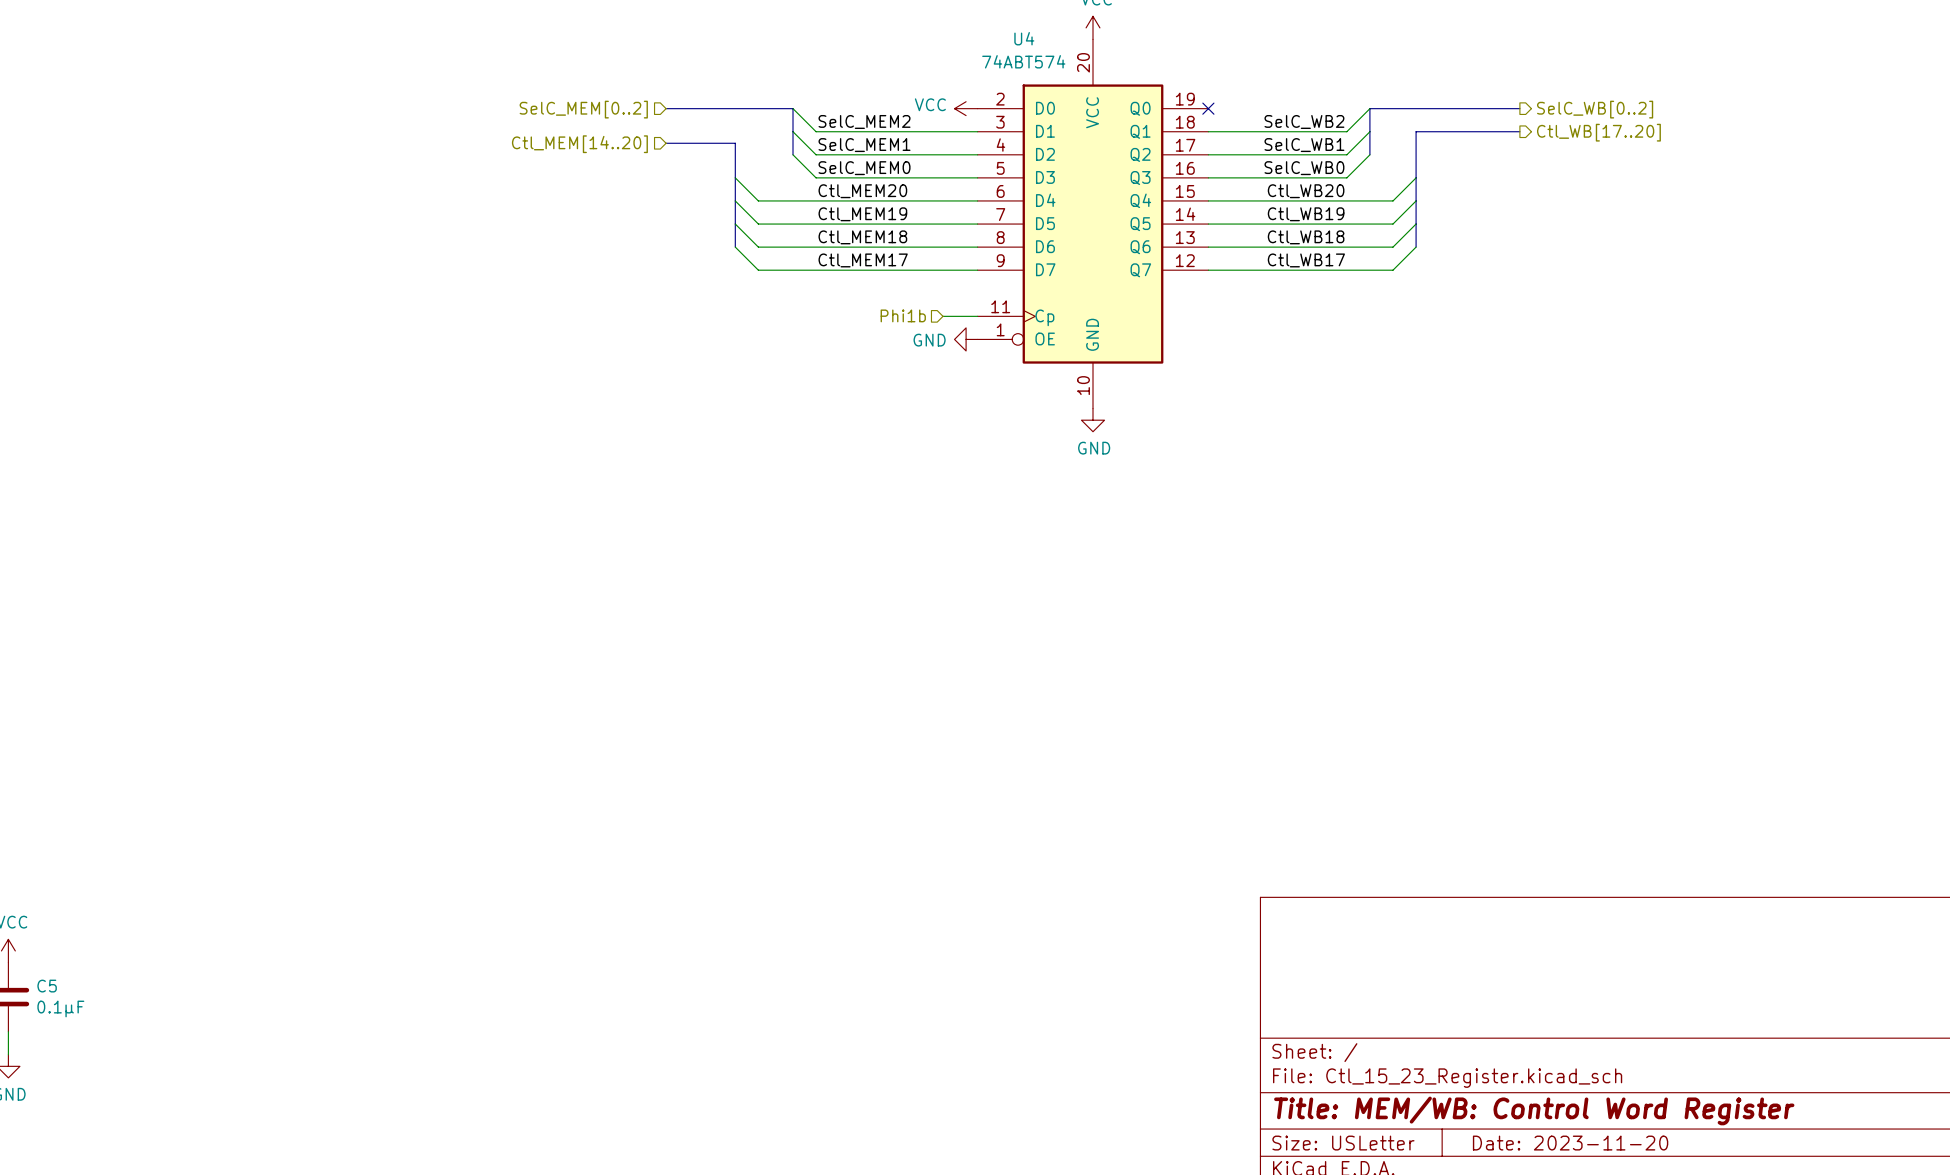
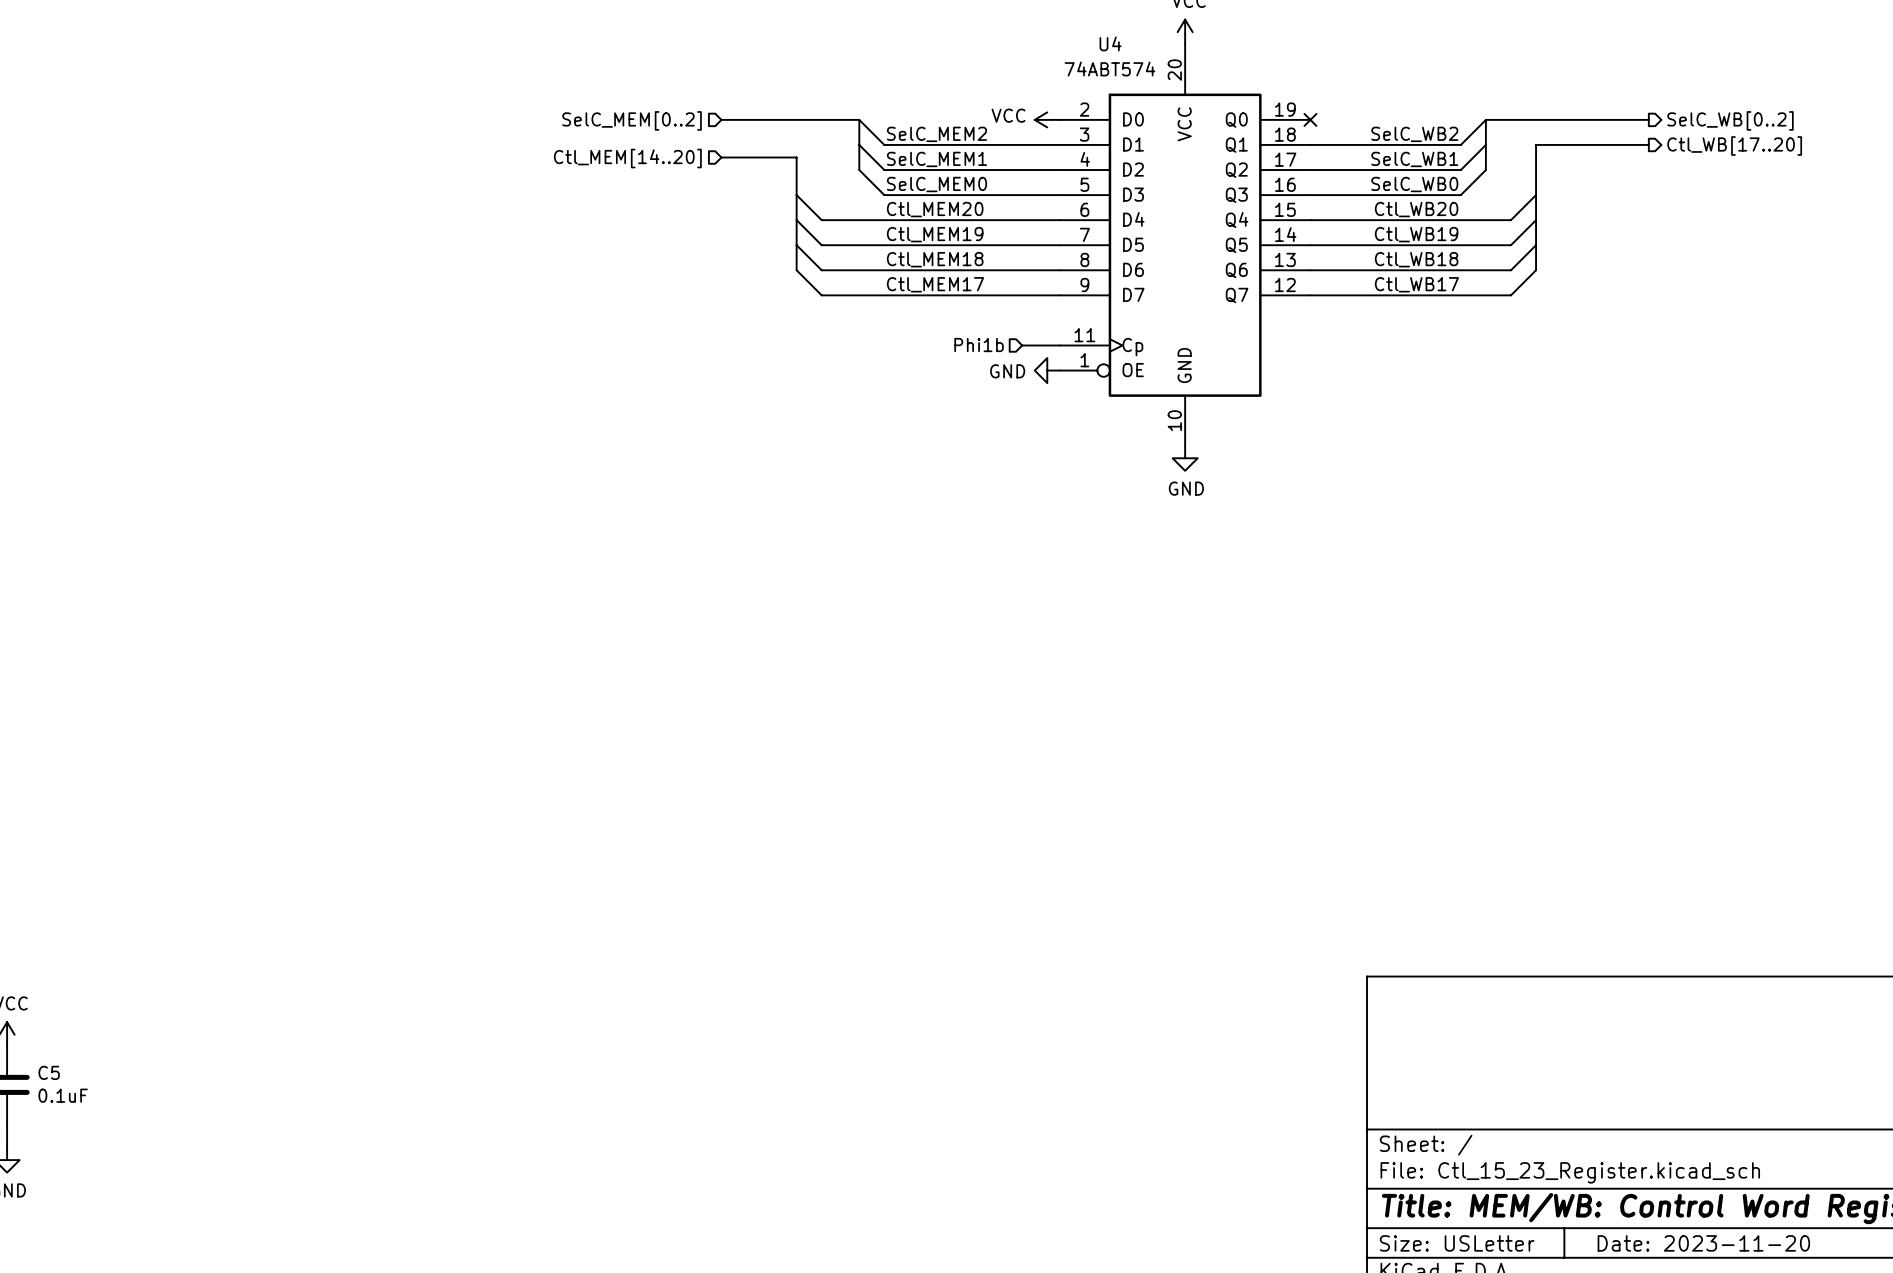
C5 value: 0.1μF (60, 1008) -> 0.1uF (63, 1095)

